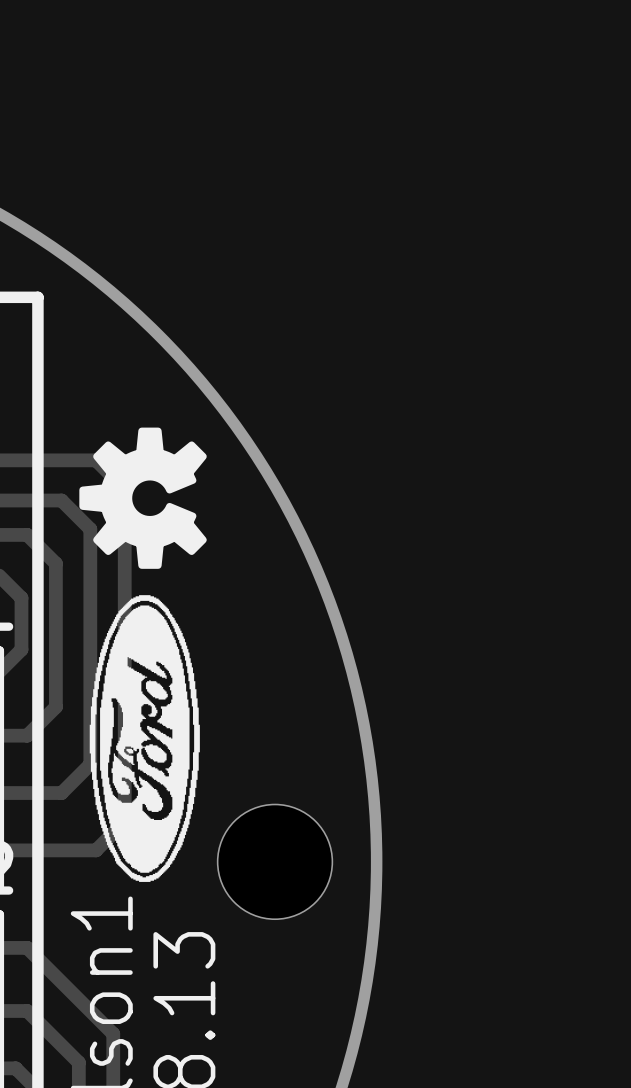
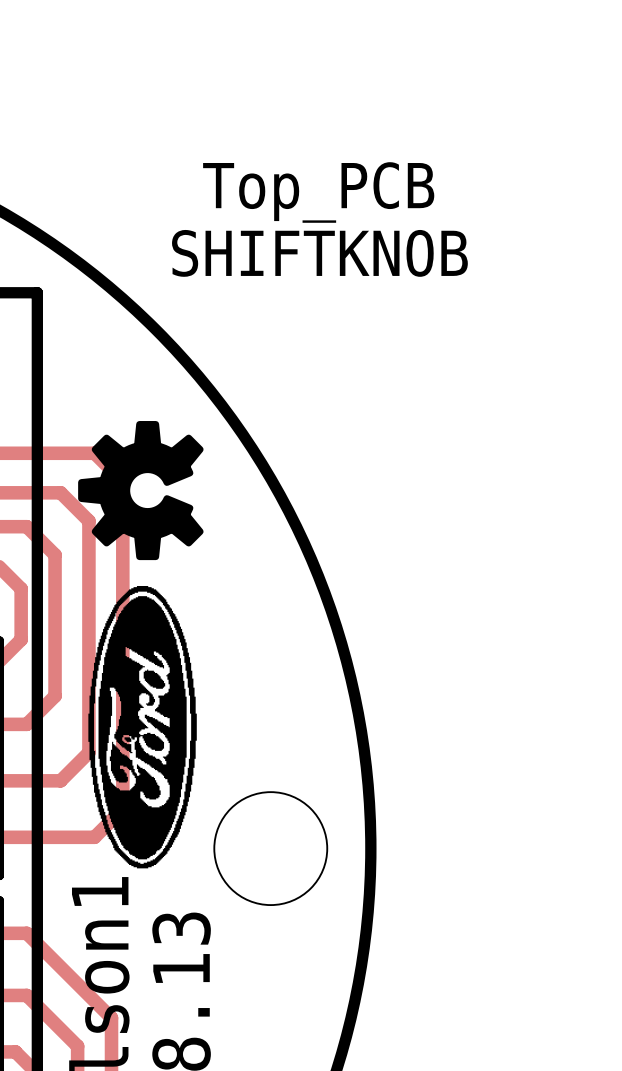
text: none -> Top_PCB (318, 192)
text: none -> SHIFTKNOB (319, 253)

